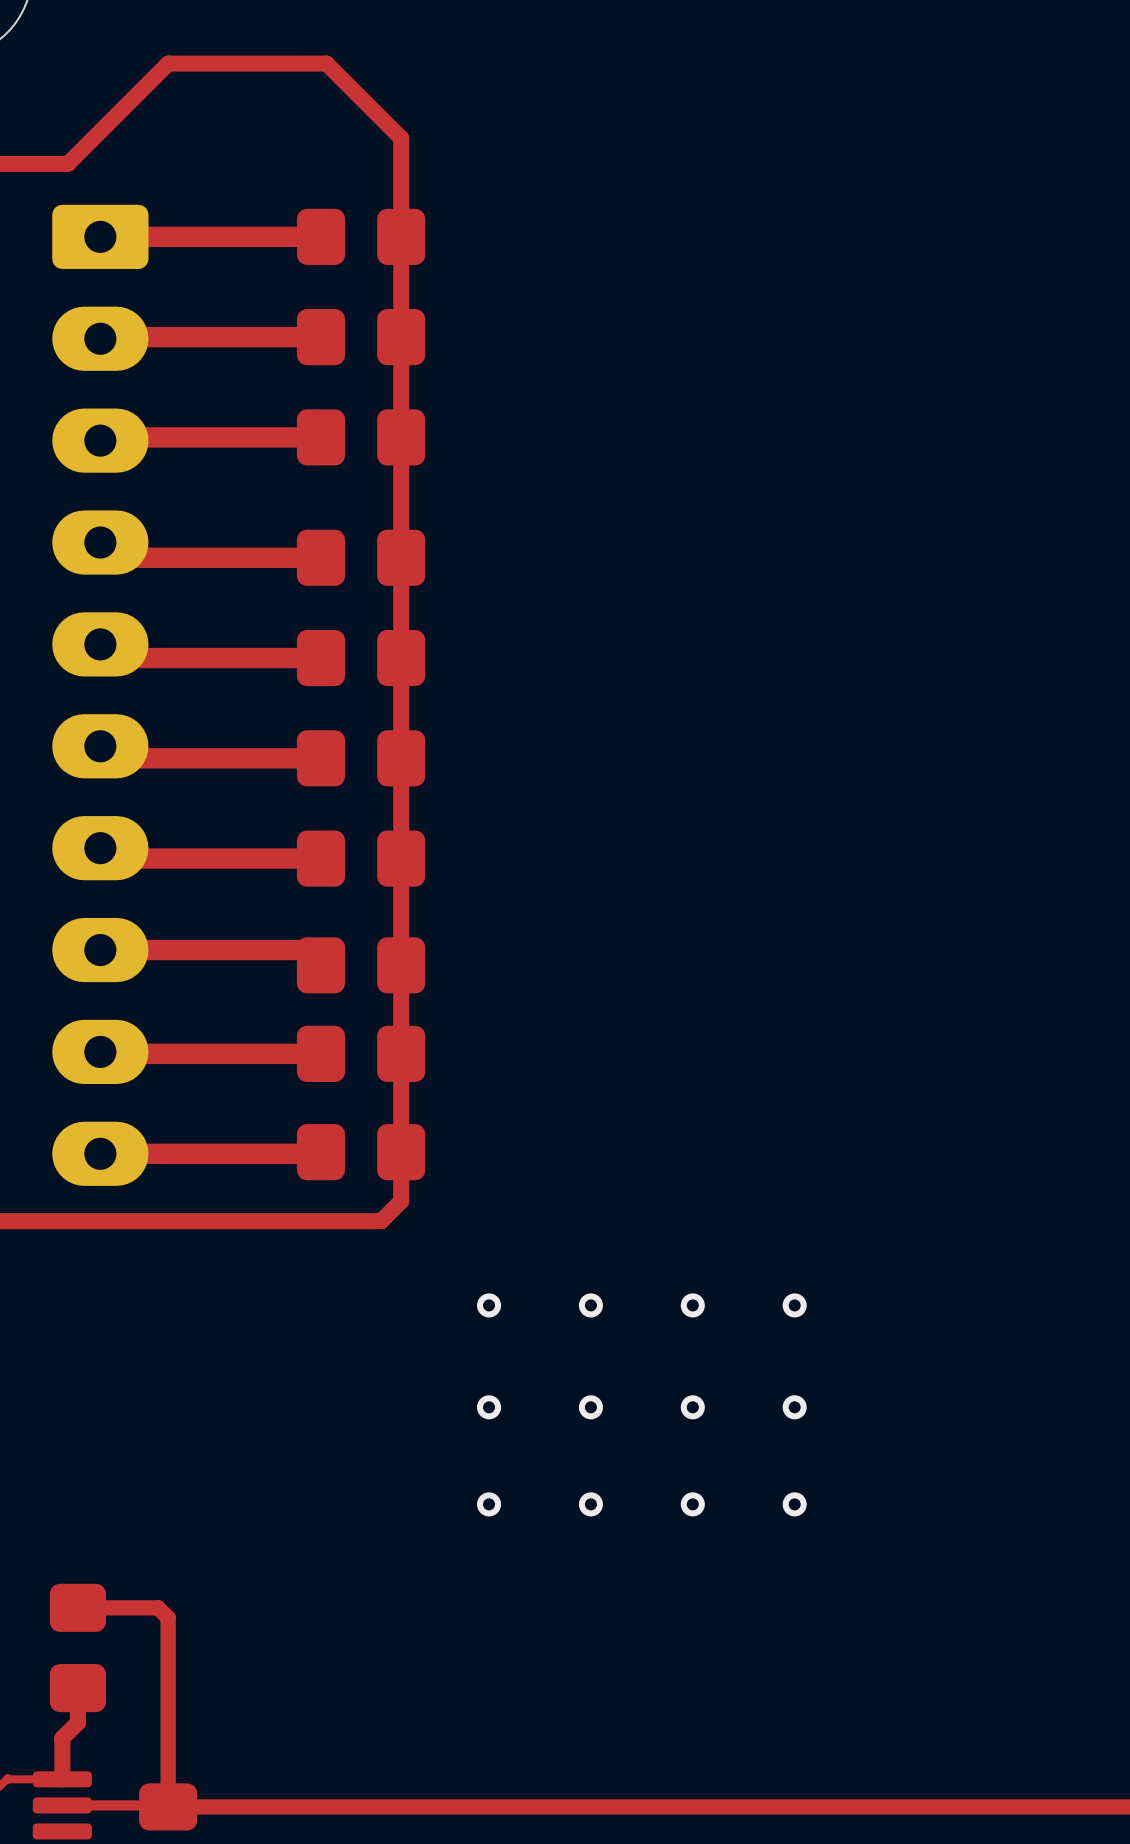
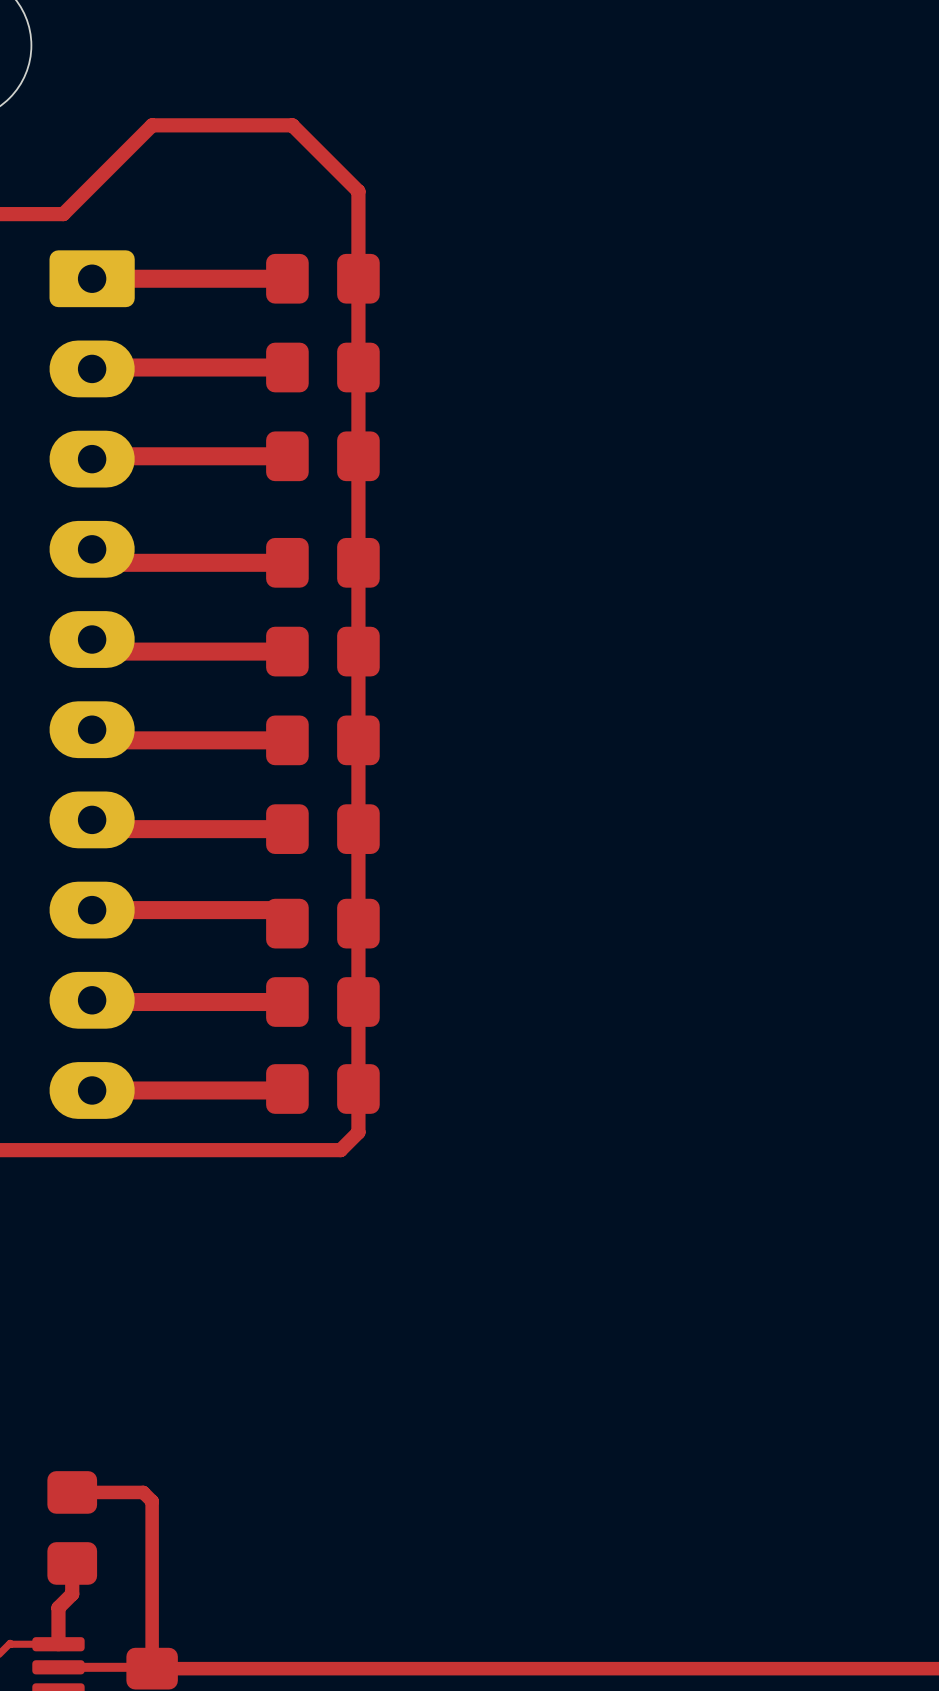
via: (489, 1305) -> none
via: (590, 1305) -> none
via: (692, 1305) -> none
via: (794, 1305) -> none
via: (489, 1407) -> none
via: (590, 1407) -> none
via: (692, 1407) -> none
via: (794, 1407) -> none
via: (489, 1504) -> none
via: (590, 1504) -> none
via: (692, 1504) -> none
via: (794, 1504) -> none

